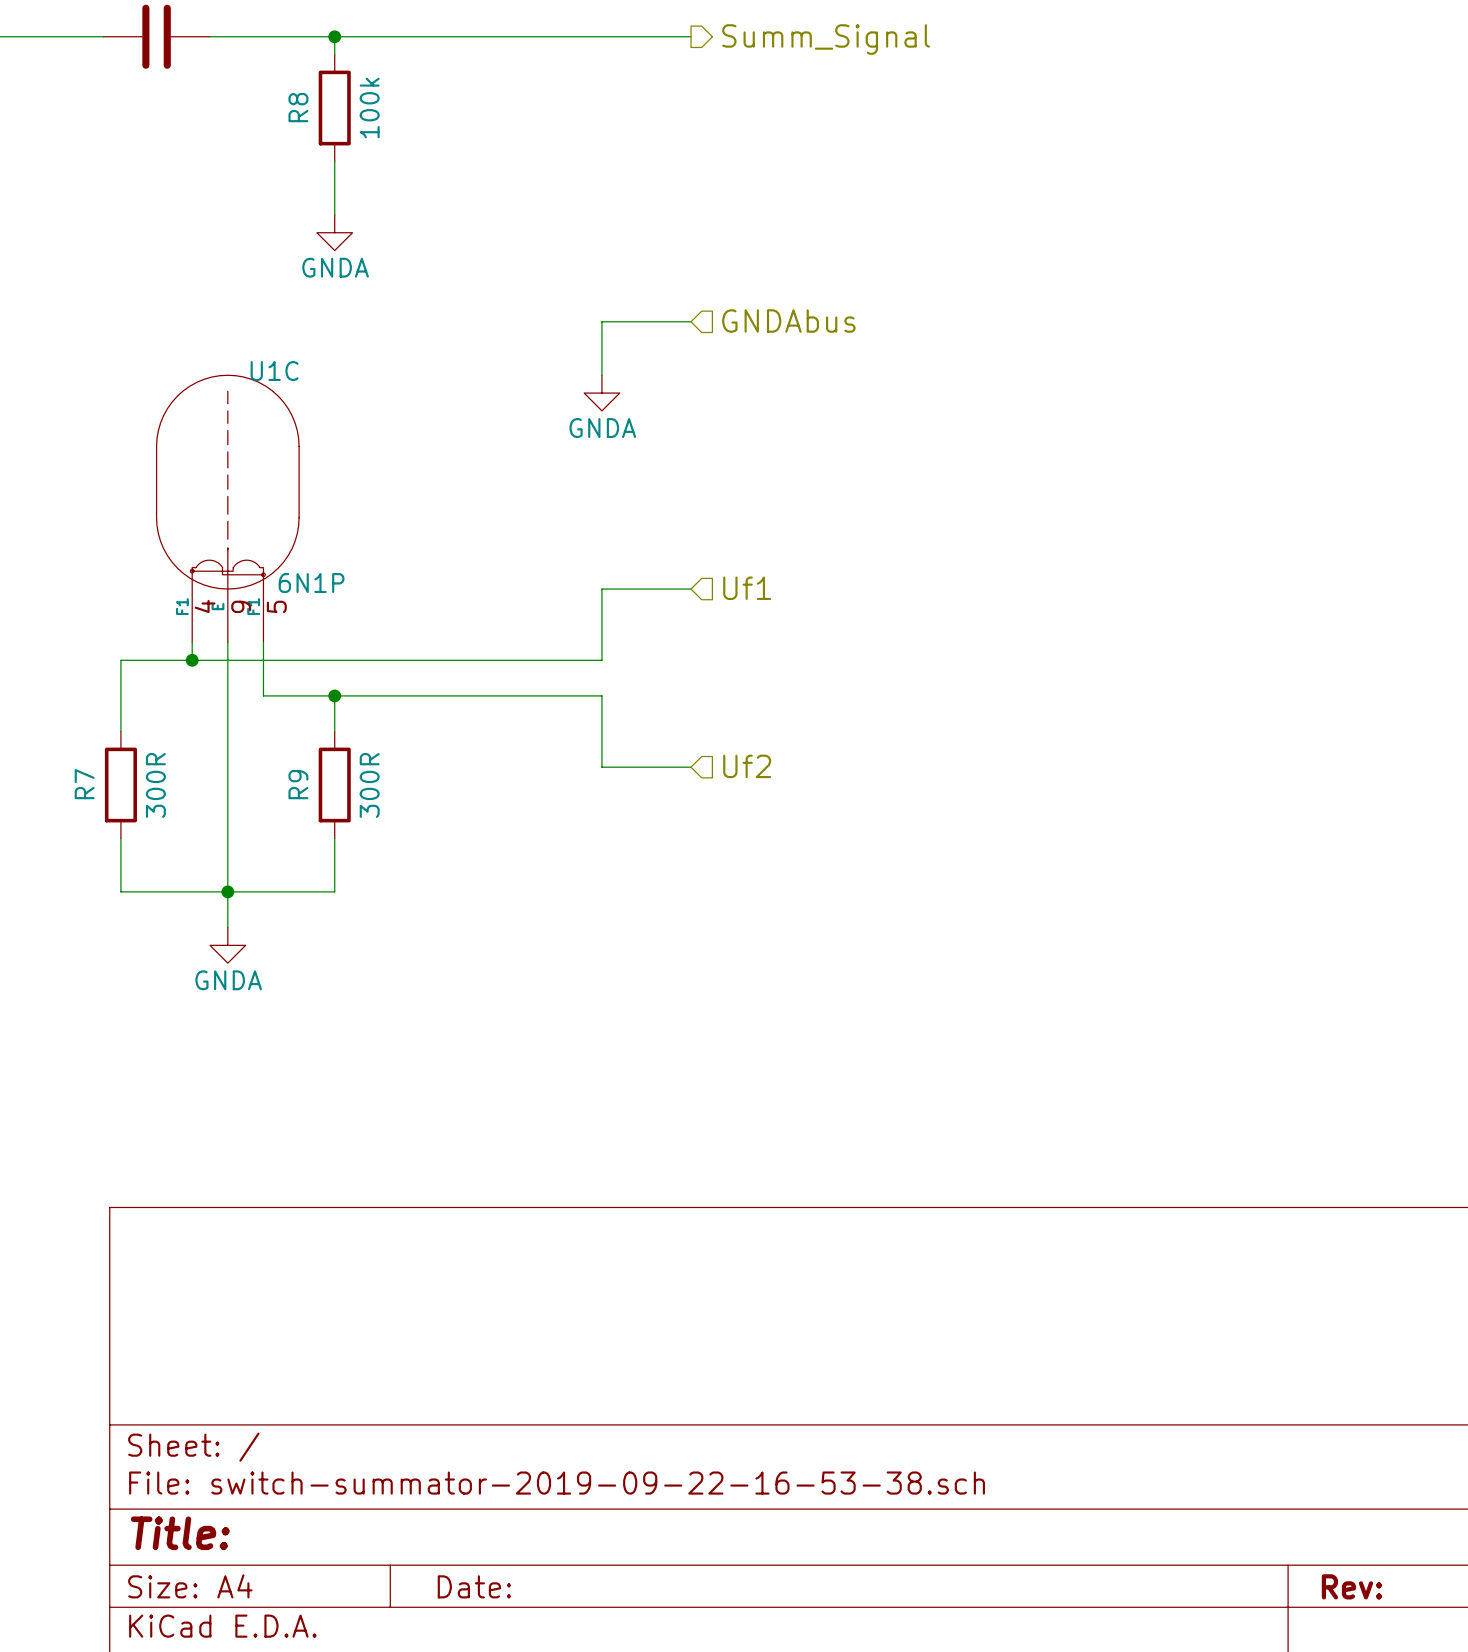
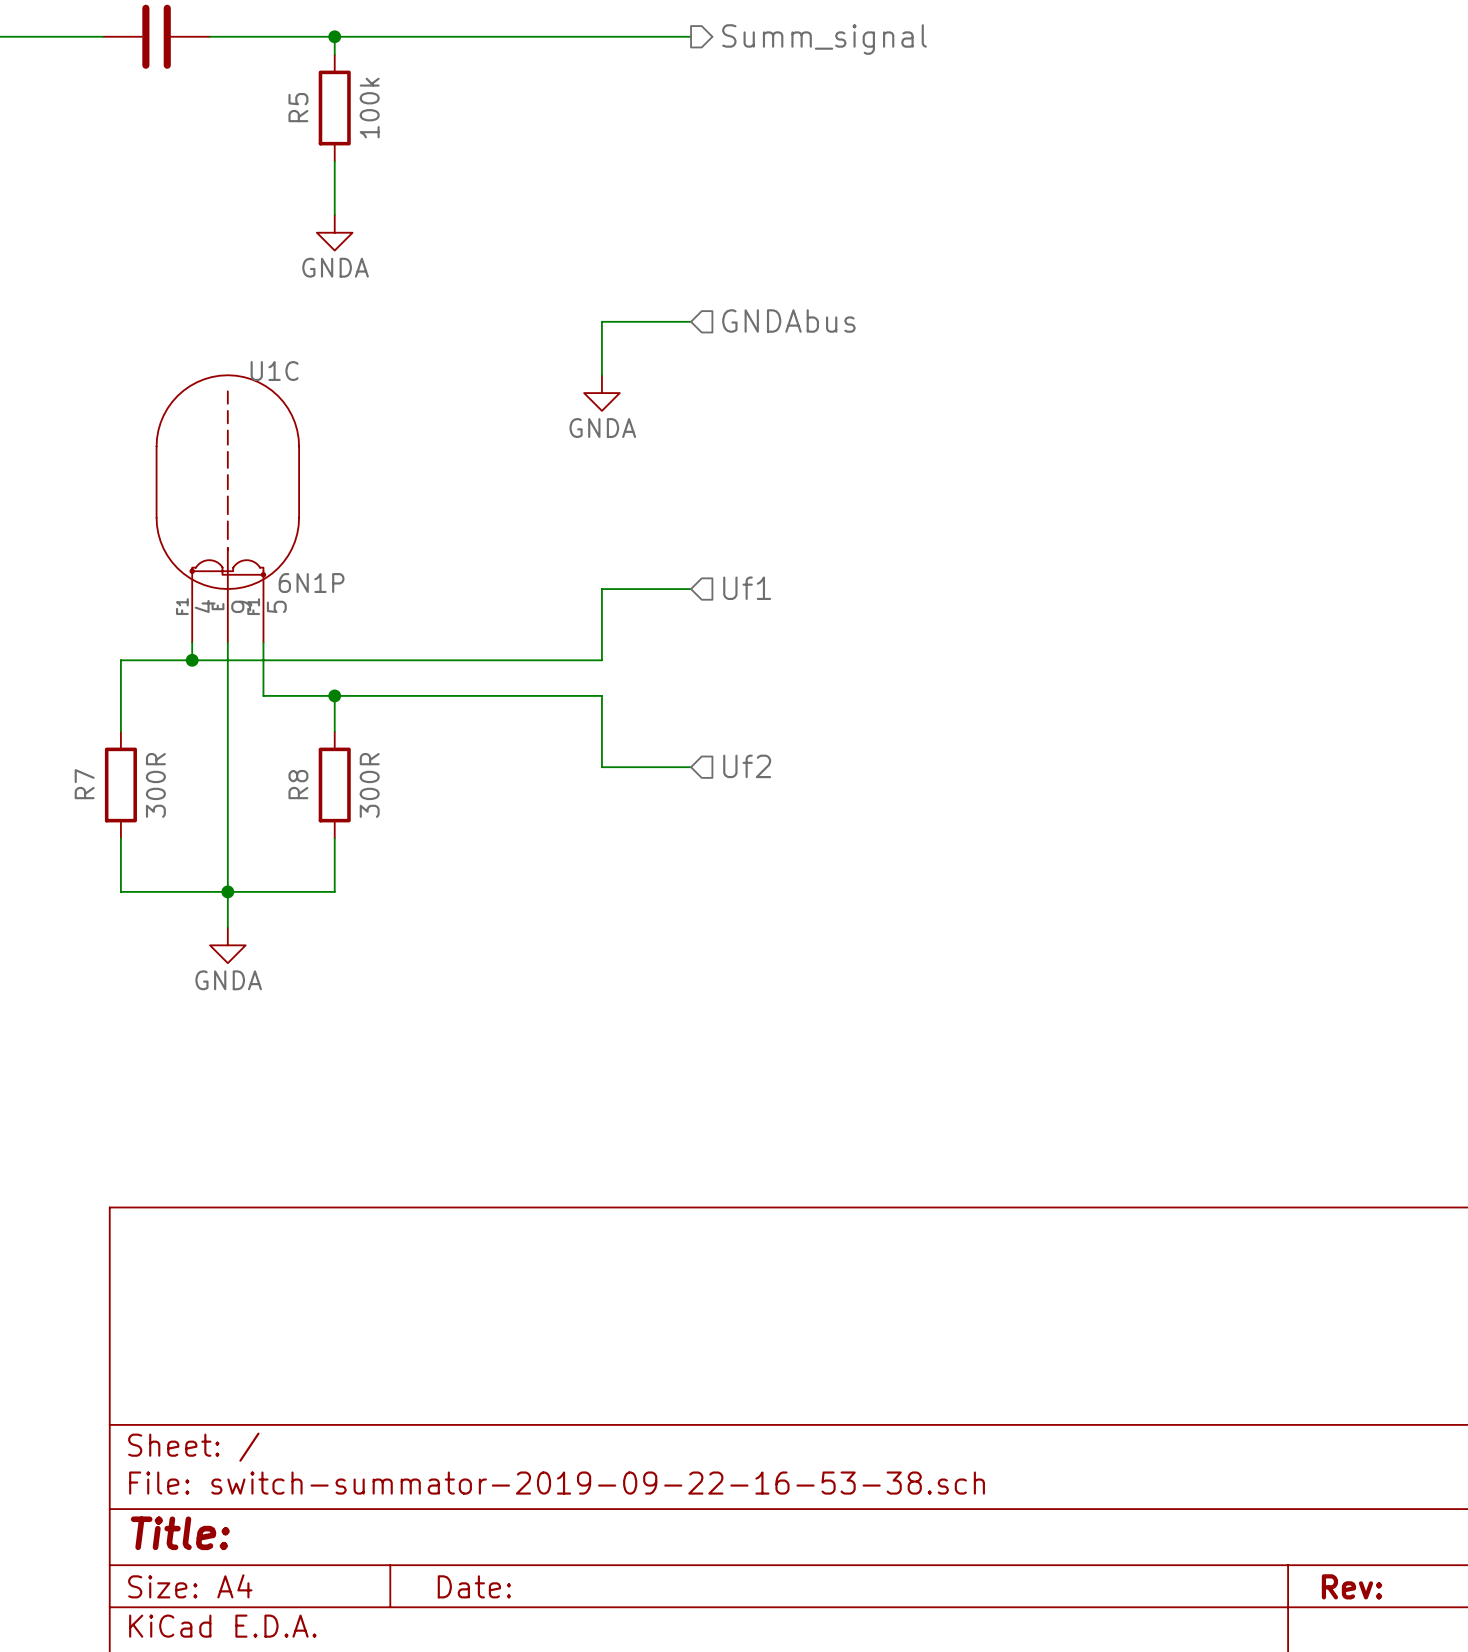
hierarchical label: Summ_Signal (826, 39) -> Summ_signal (824, 39)
R8 name: R8 (298, 107) -> R5 (298, 107)
R9 name: R9 (298, 784) -> R8 (298, 784)

